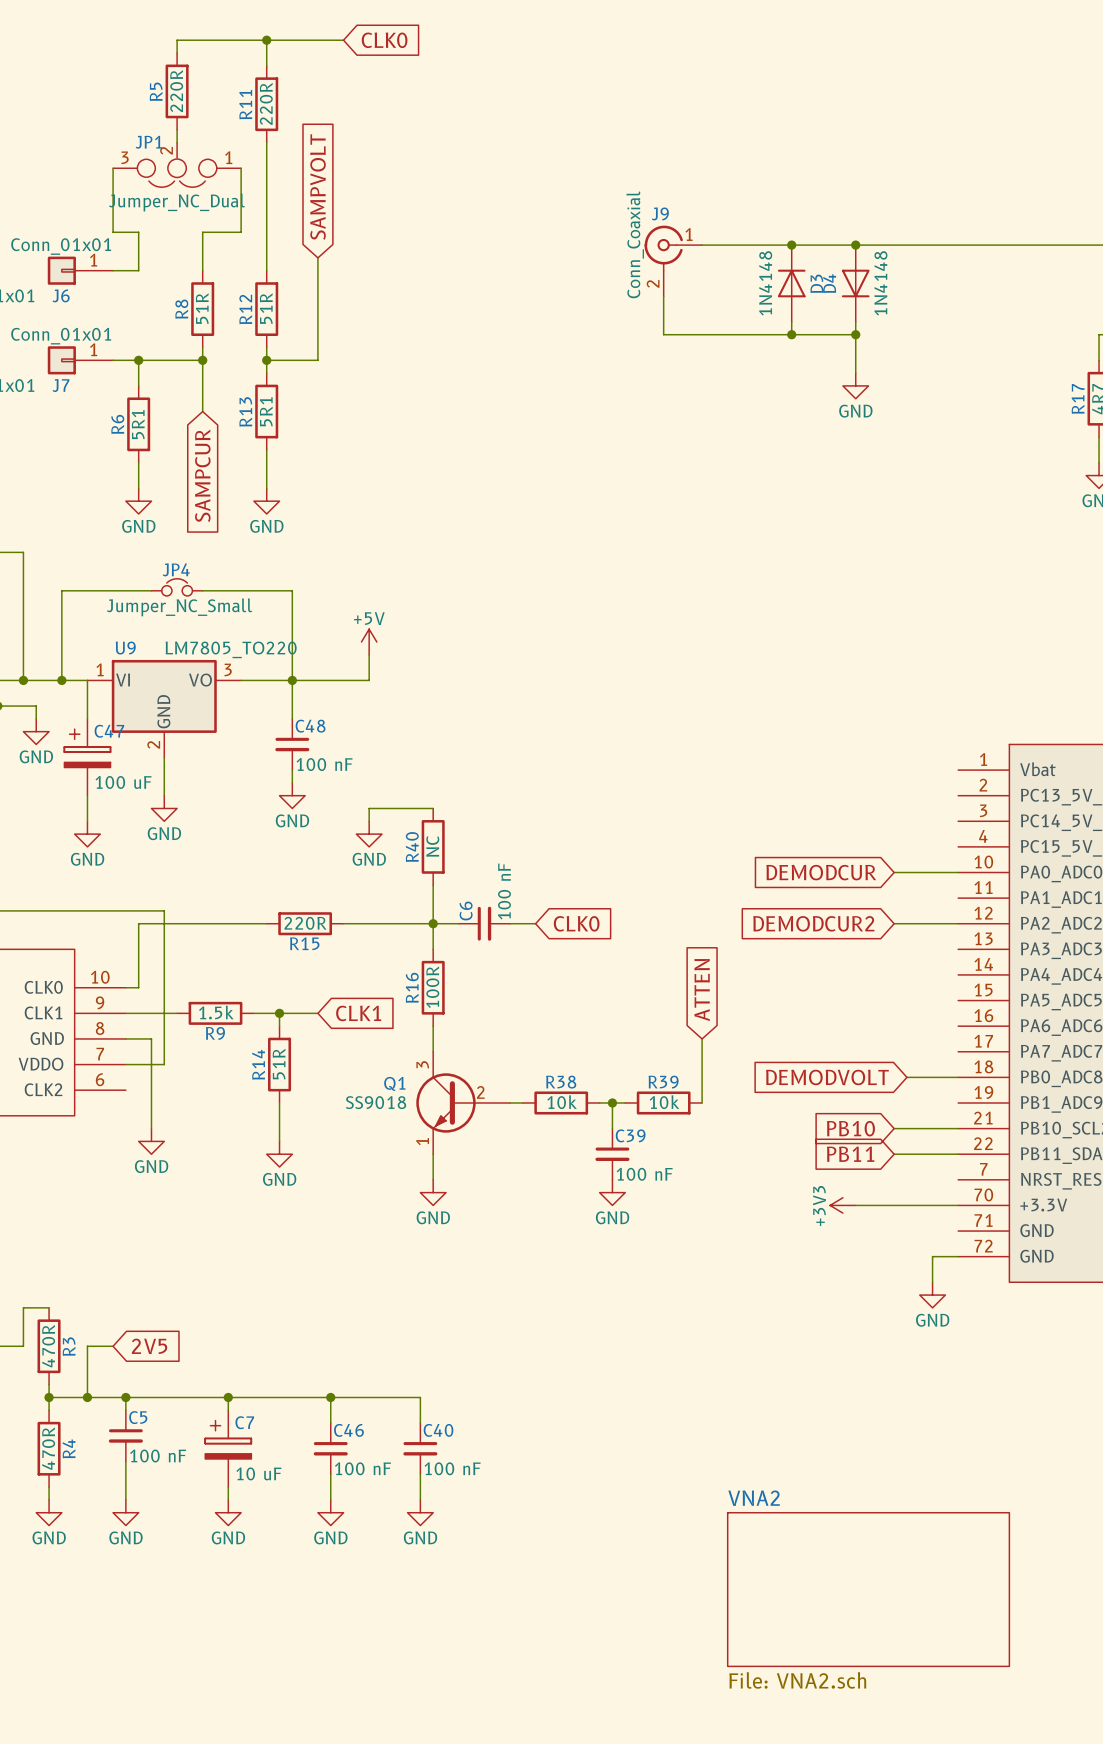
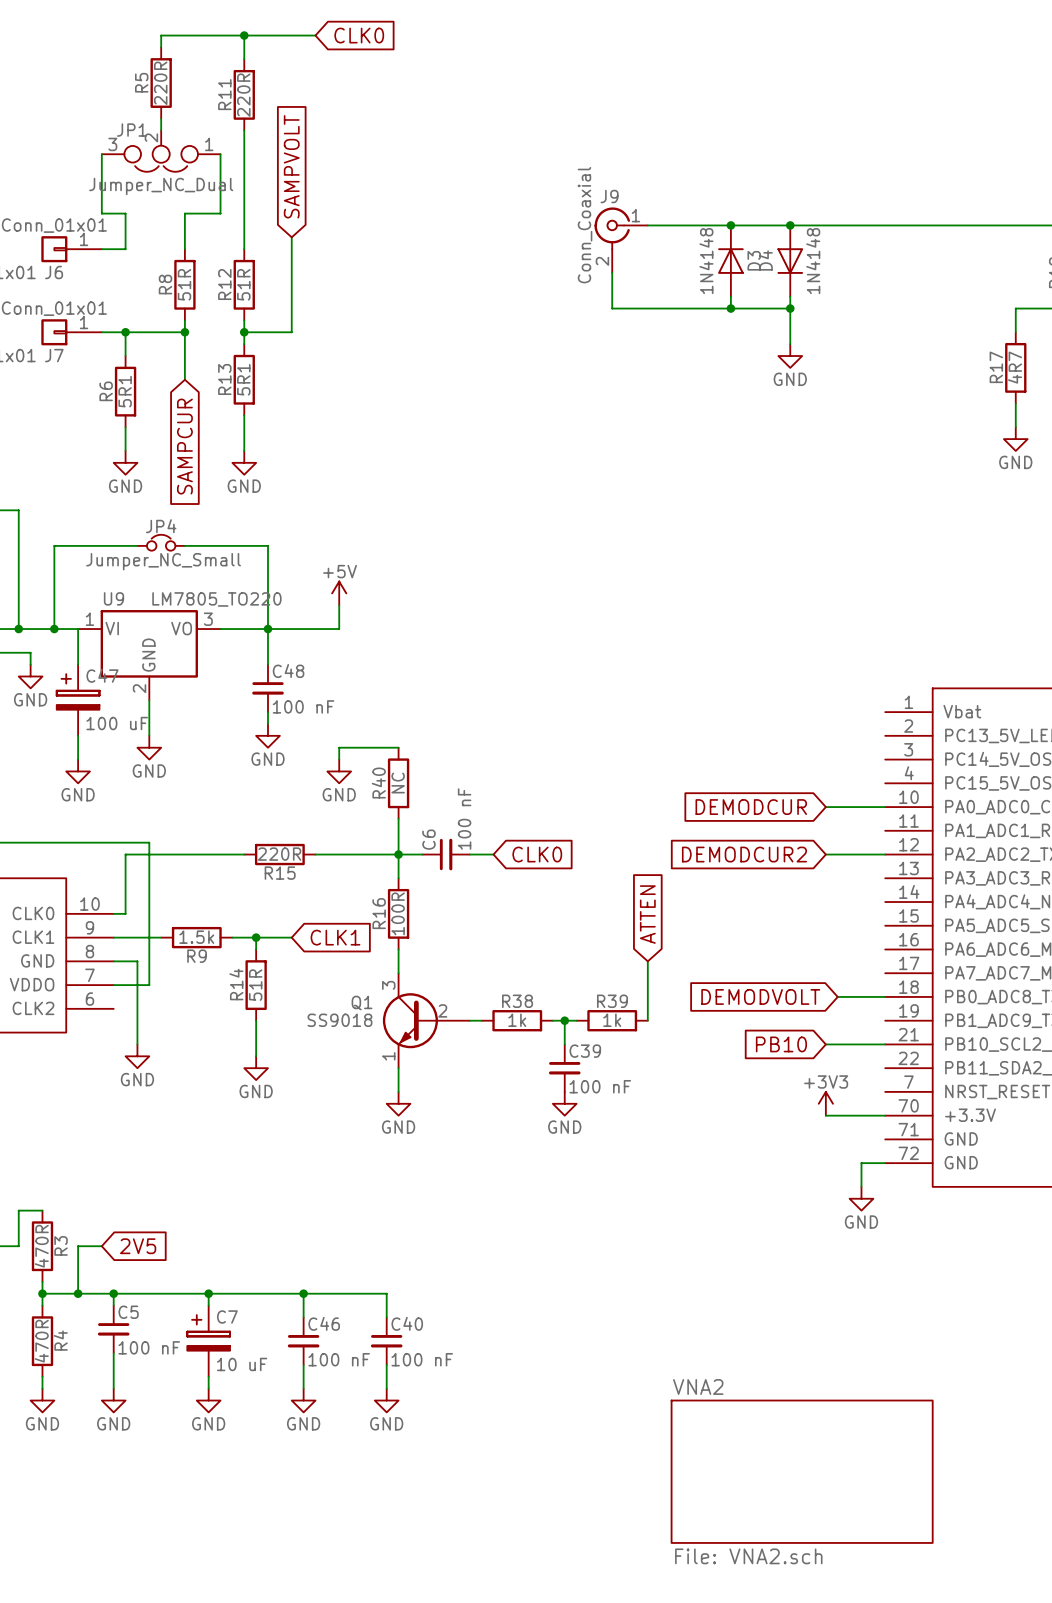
R38 value: 10k (562, 1102) -> 1k (517, 1020)
R39 value: 10k (664, 1102) -> 1k (612, 1020)
global label: PB11 (850, 1154) -> none
wire: (894, 1154) (958, 1154) -> none
power symbol rotation: 0° (842, 1205) -> 90° clockwise (825, 1103)
power symbol position: +3V3 (842, 1205) -> +3V3 (825, 1103)
wire: (855, 1205) (894, 1205) -> none

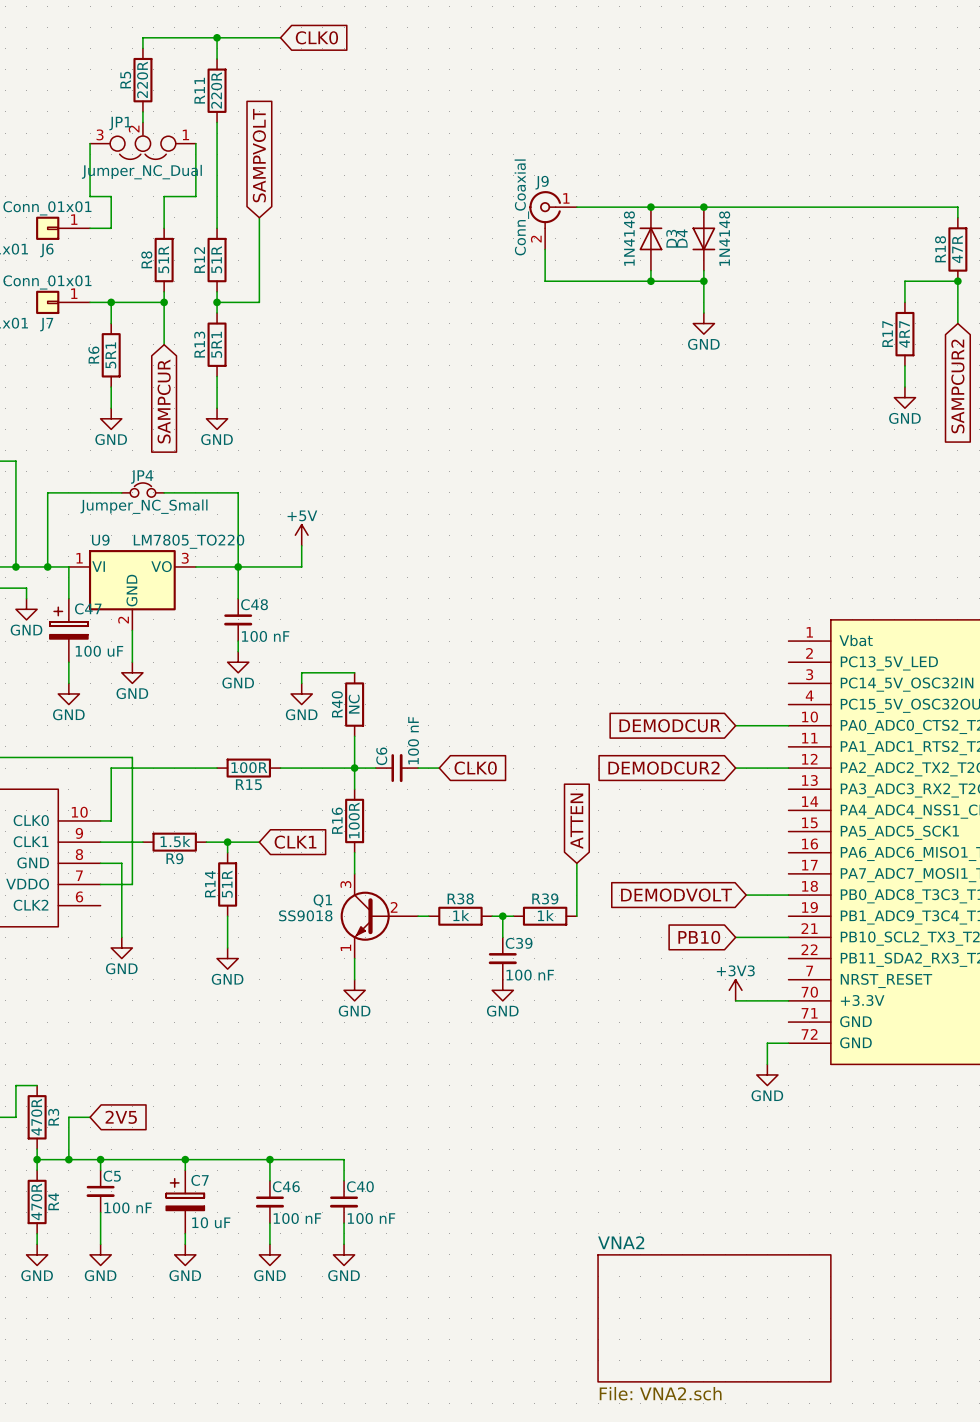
R15 value: 220R (279, 854) -> 100R (249, 767)

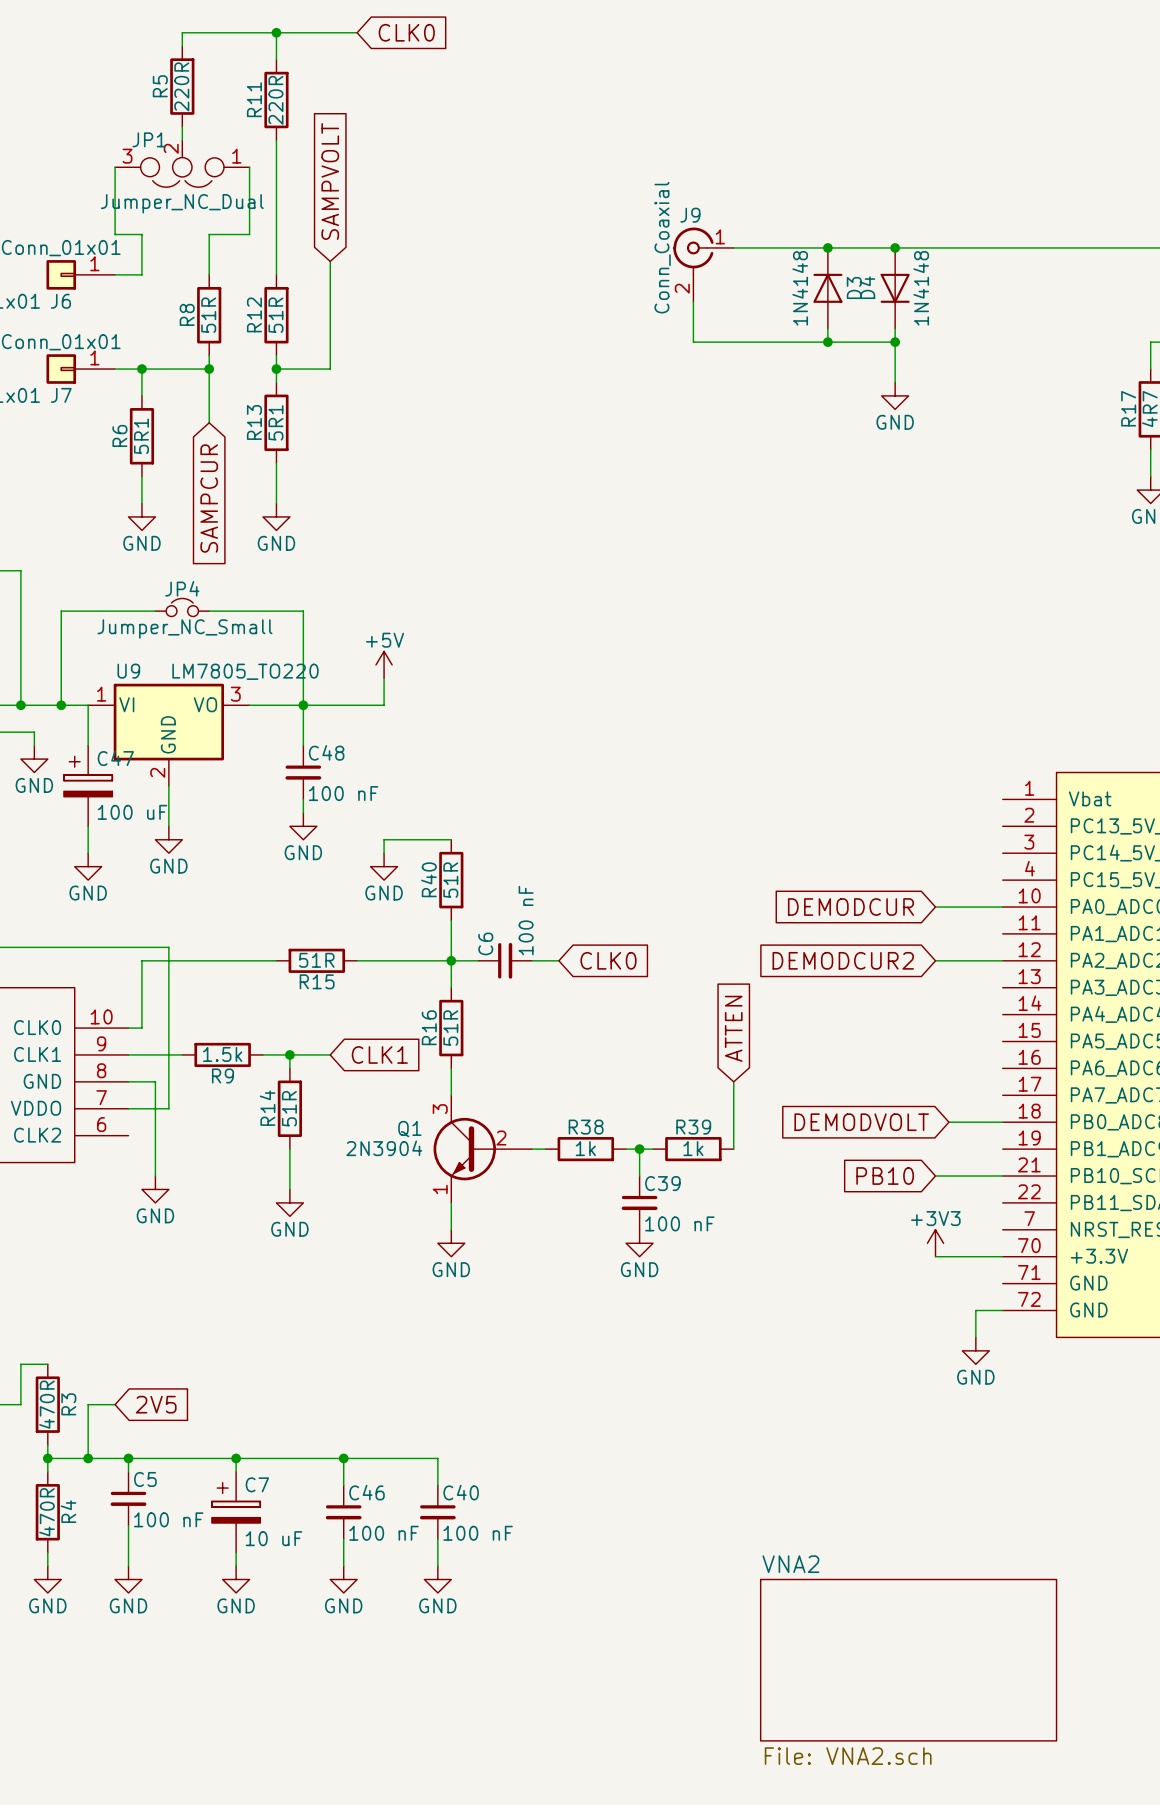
R40 value: NC (354, 704) -> 51R (450, 880)
R15 value: 100R (249, 767) -> 51R (316, 960)
R16 value: 100R (354, 820) -> 51R (450, 1028)
Q1 value: SS9018 (305, 915) -> 2N3904 (384, 1148)

